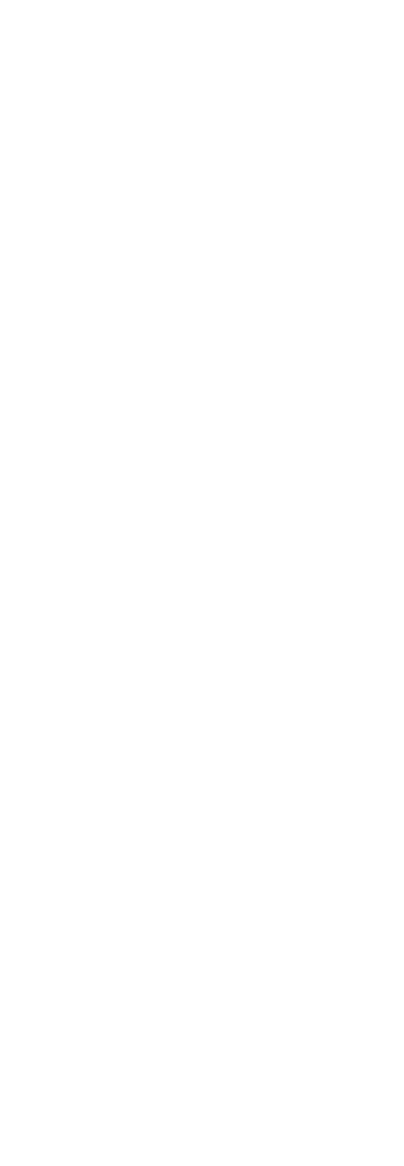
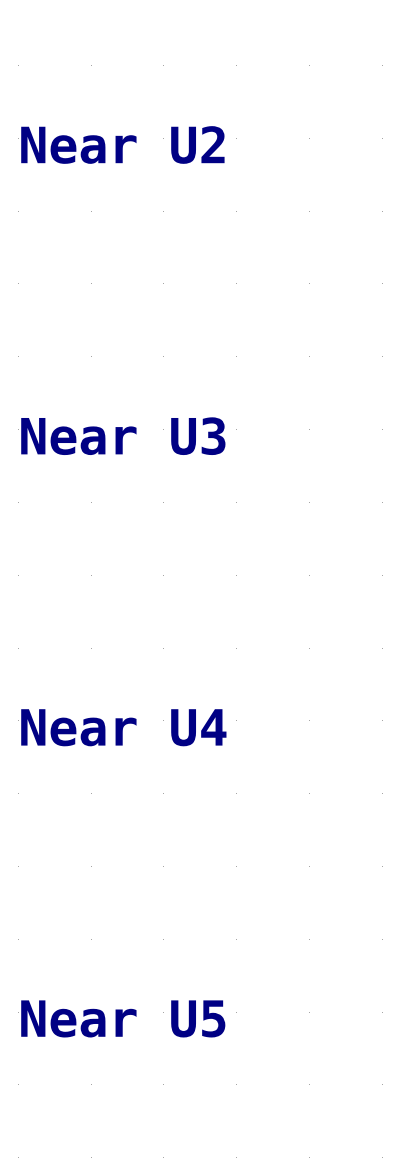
text: none -> Near U2 (122, 144)
text: none -> Near U3 (123, 436)
text: none -> Near U4 (123, 727)
text: none -> Near U5 (123, 1018)

